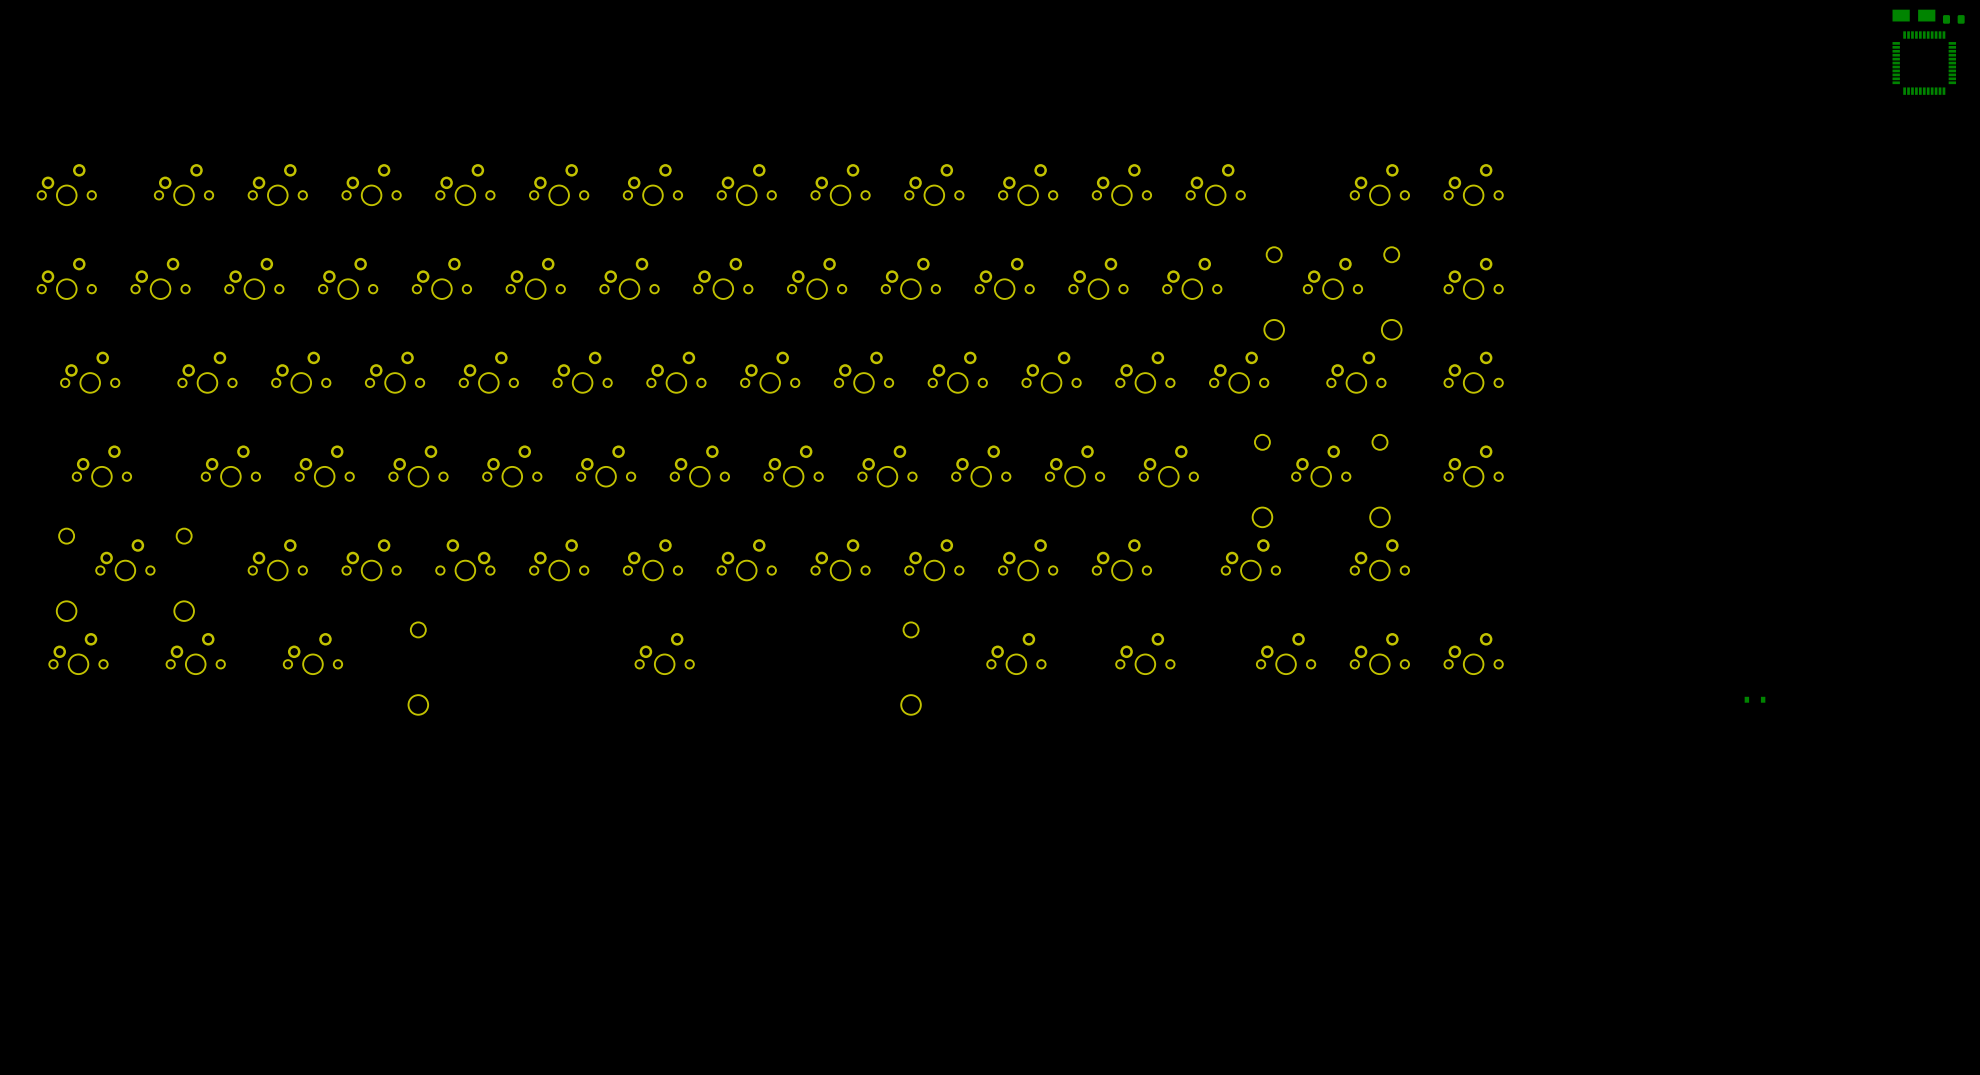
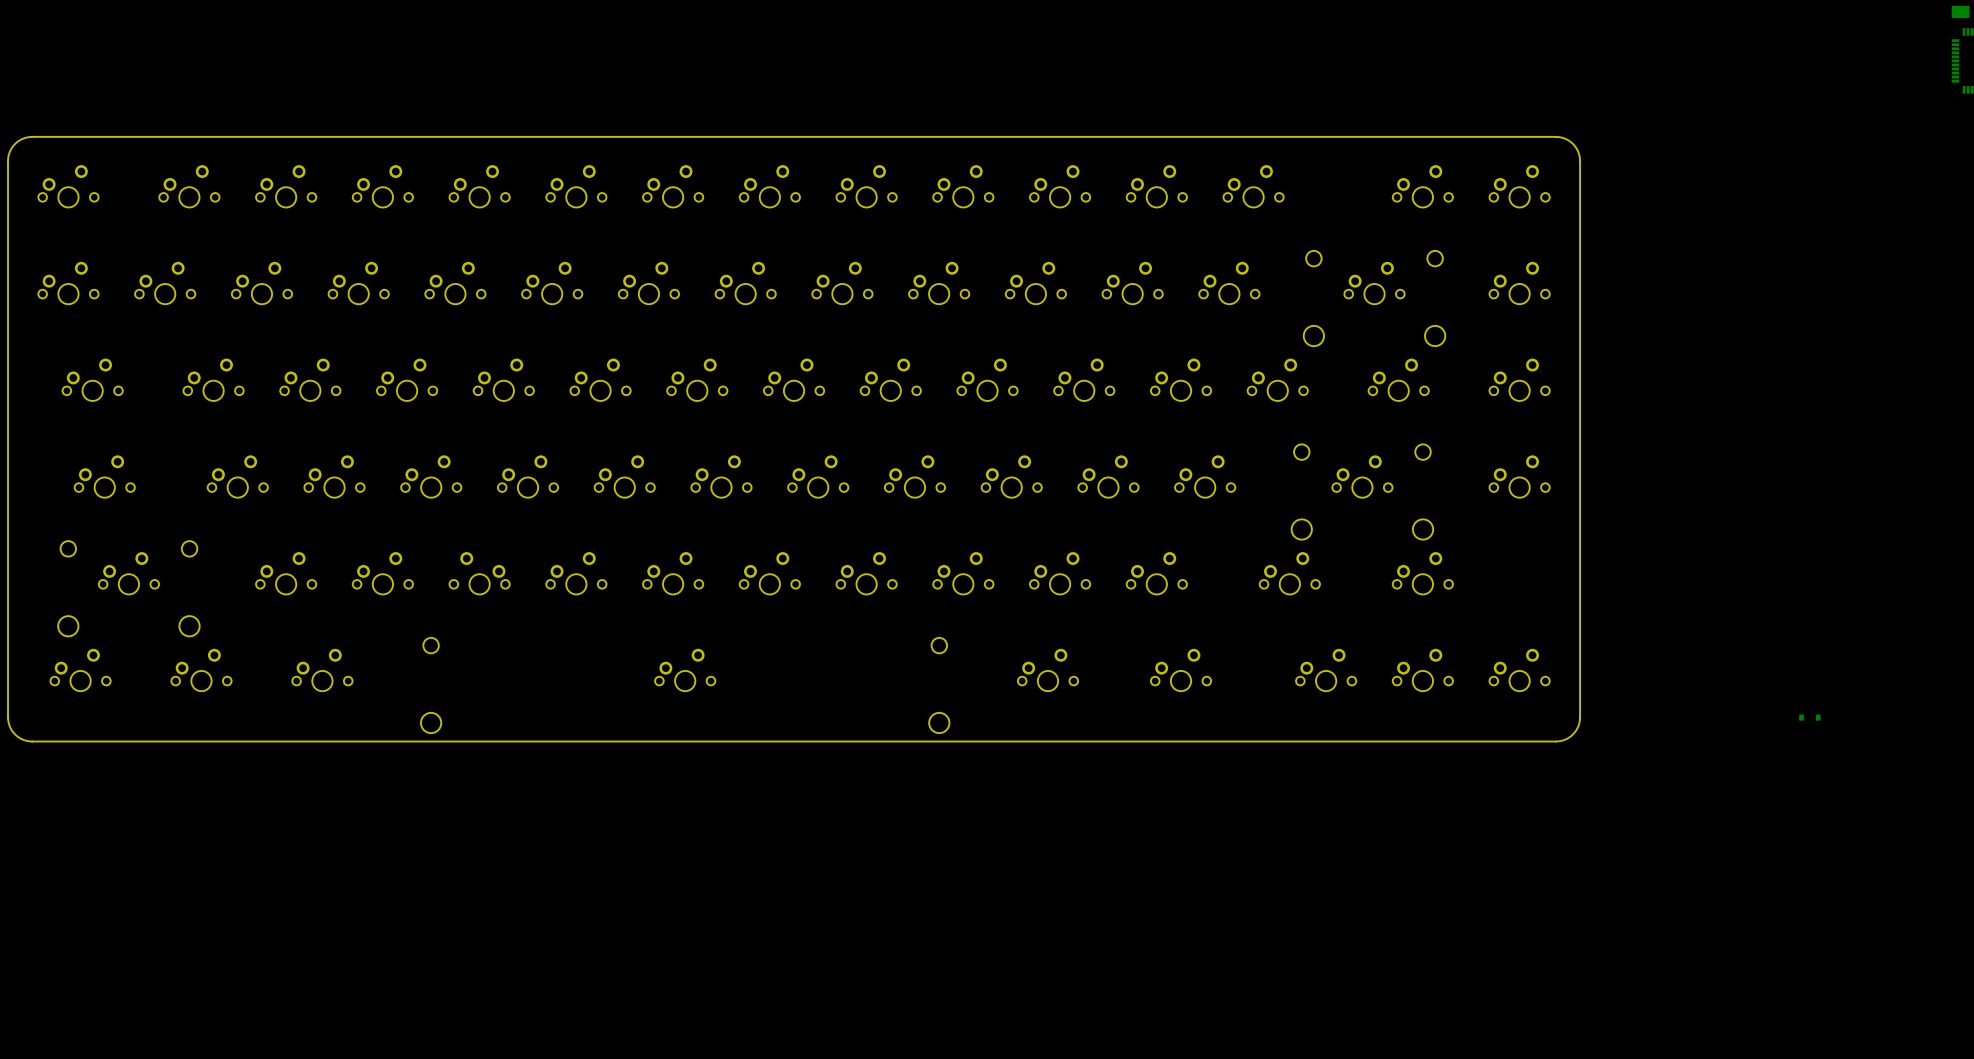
board edge: none -> (32, 136) (1563, 138) (1574, 145) (1580, 161) (1578, 725) (1568, 737) (1555, 741) (24, 740) (11, 730) (8, 717) (8, 161) (9, 153) (15, 143) (21, 139) (32, 136)

